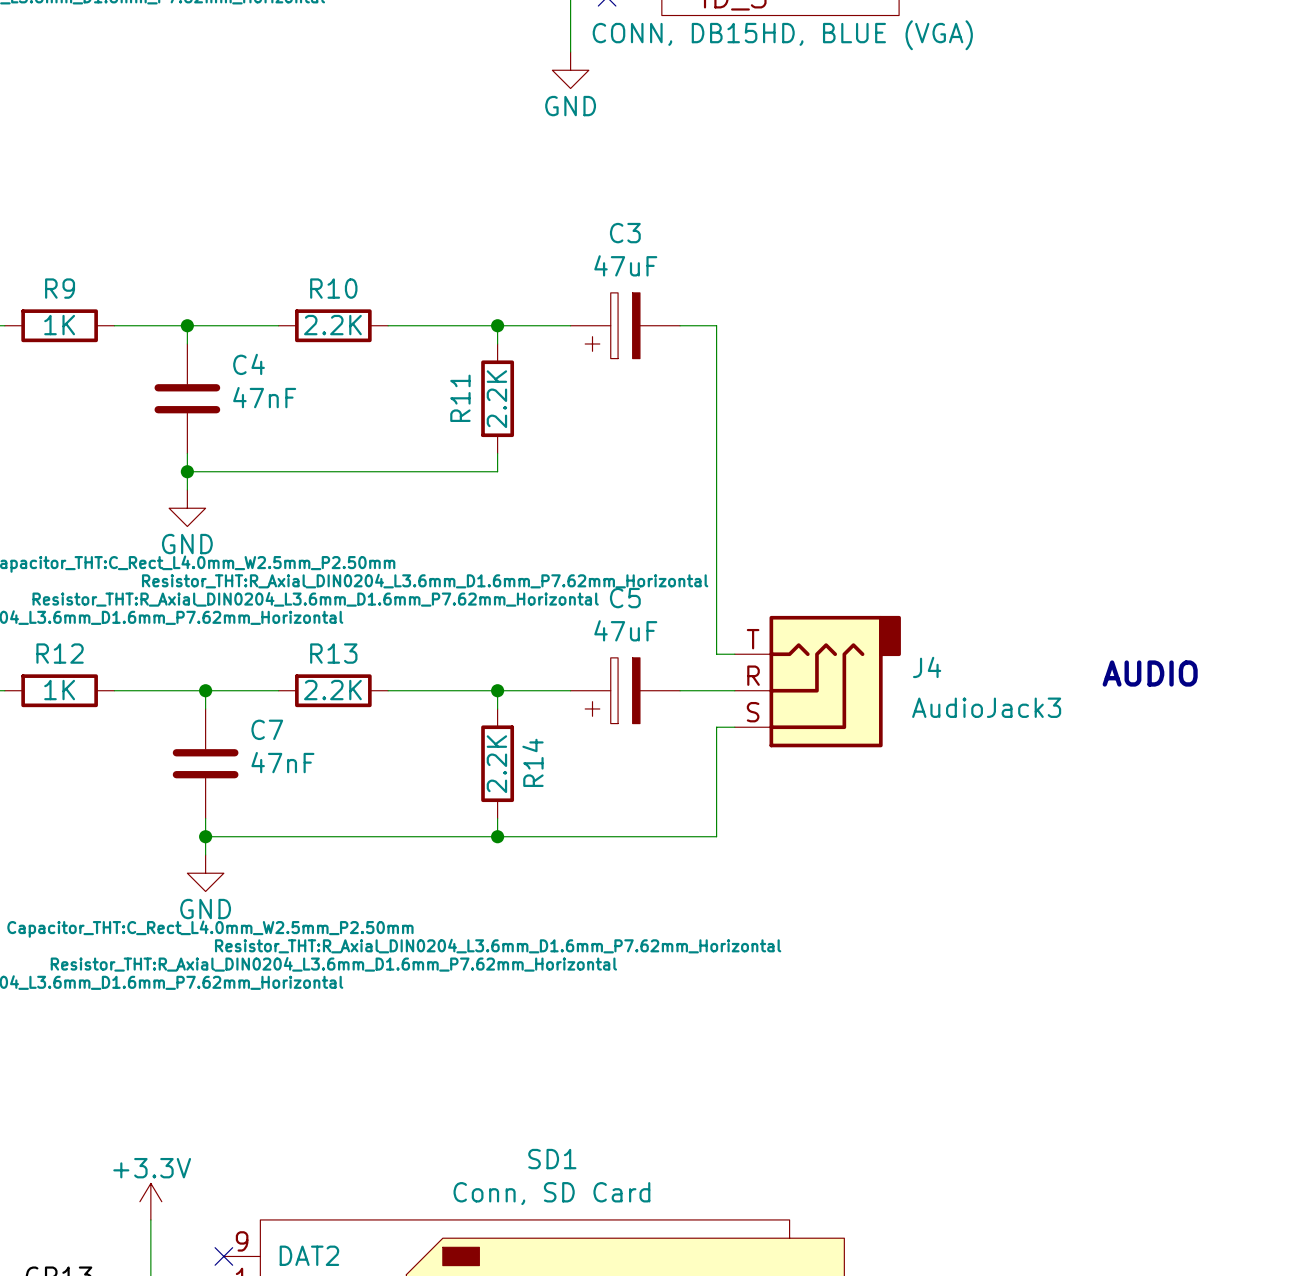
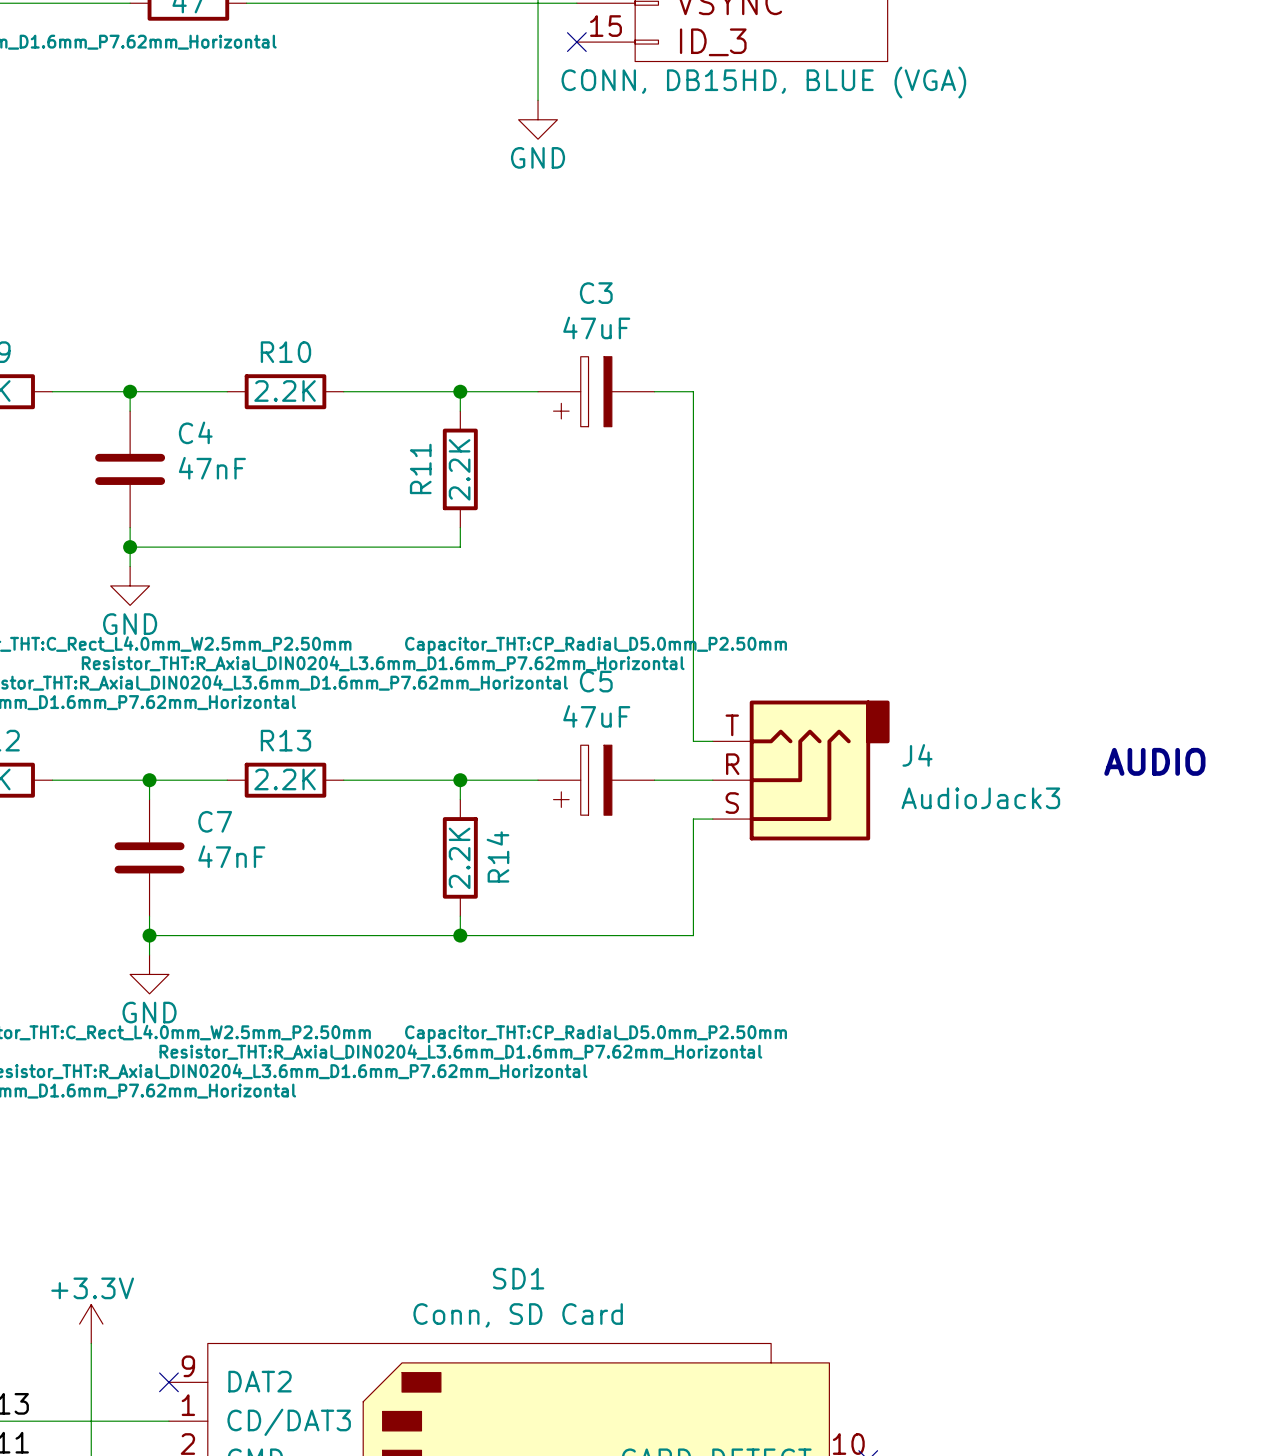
C3 text: none -> Capacitor_THT:CP_Radial_D5.0mm_P2.50mm (596, 645)
C5 text: none -> Capacitor_THT:CP_Radial_D5.0mm_P2.50mm (596, 1034)

